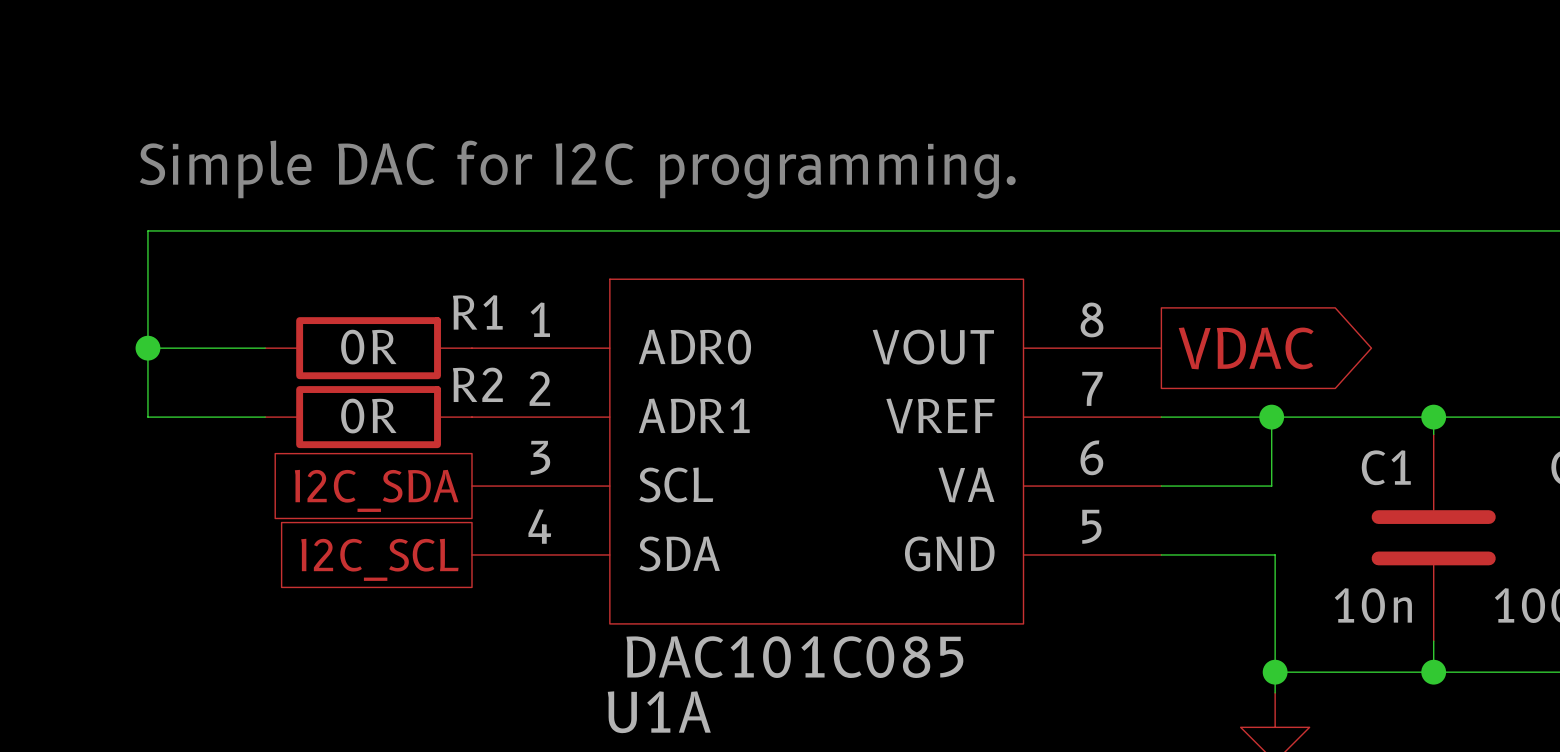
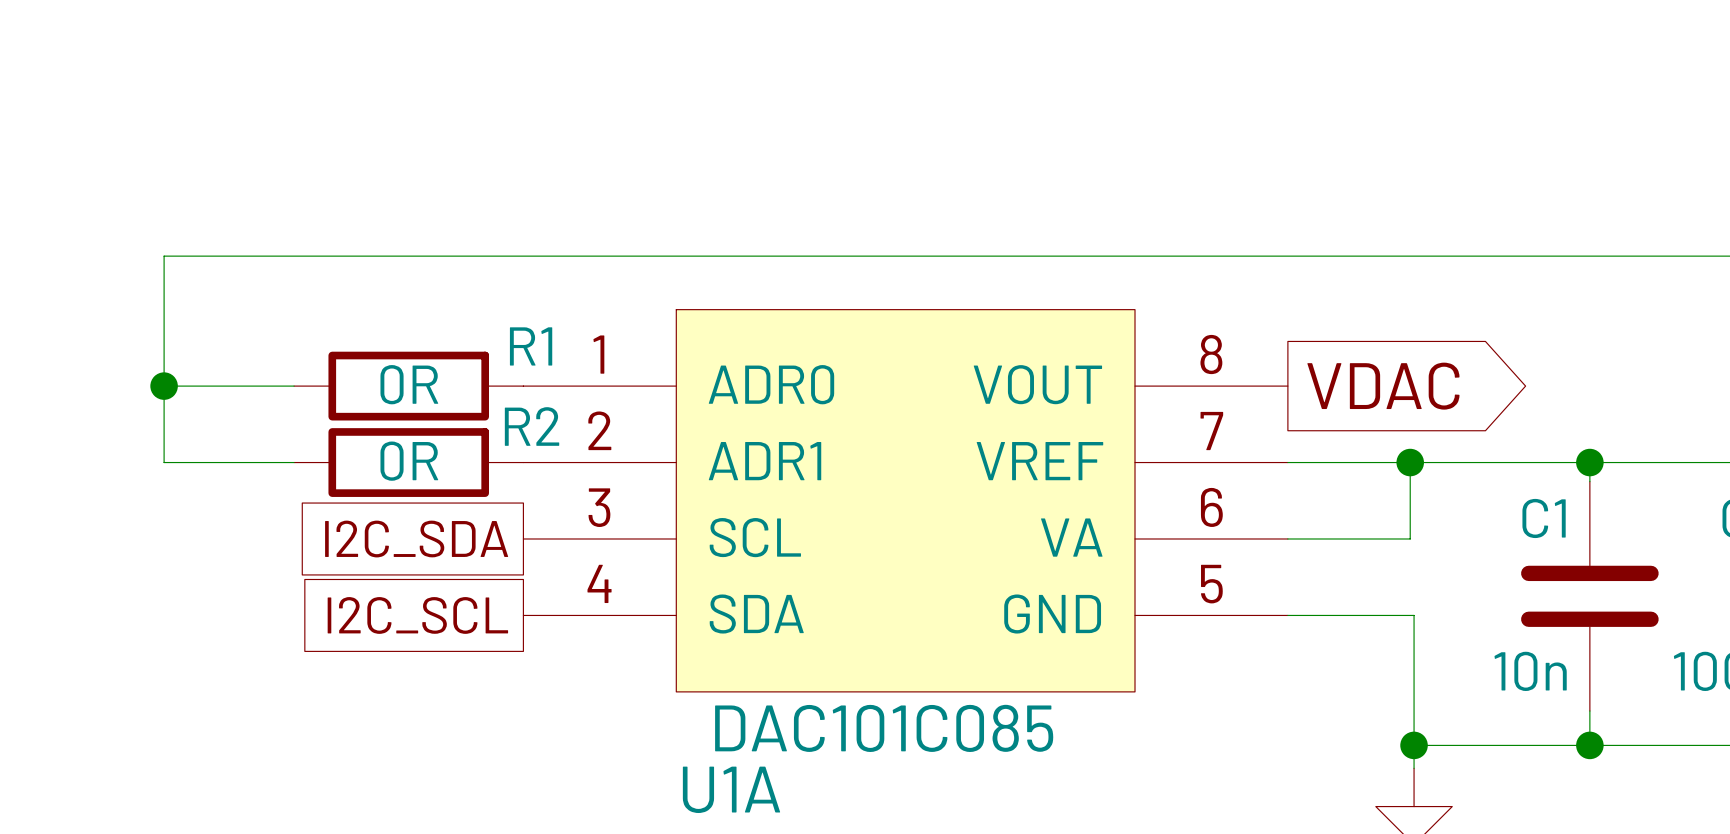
text: Simple DAC for I2C programming. (577, 169) -> none

